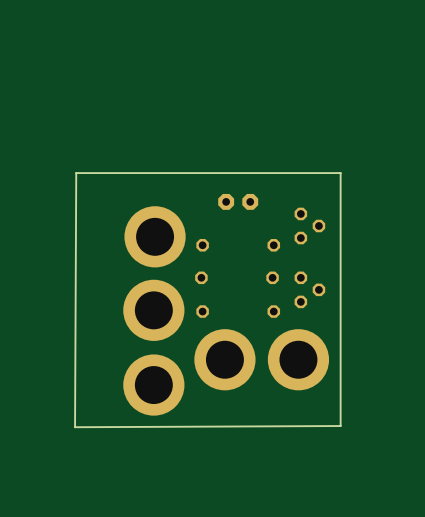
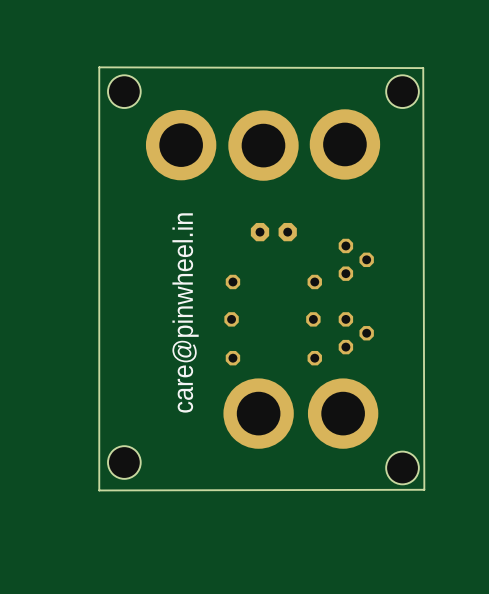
hole: none -> (124, 91)
hole: none -> (402, 91)
part: none -> (344, 144)
part: none -> (181, 145)
part: none -> (263, 145)
board edge: (340, 173) (76, 173) (75, 427) (340, 426) (340, 173) -> (99, 67) (423, 68) (424, 489) (99, 490) (99, 67)
part: (155, 236) -> none
text: none -> care@pinwheel.in (185, 312)
part: (153, 310) -> none
part: (153, 385) -> none
hole: none -> (124, 462)
hole: none -> (402, 467)

